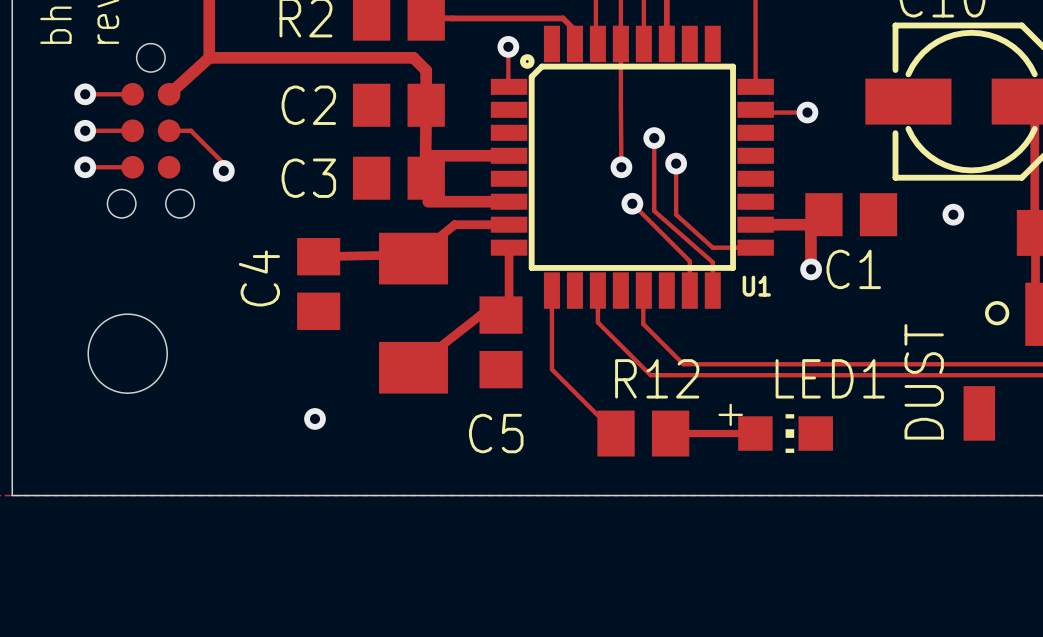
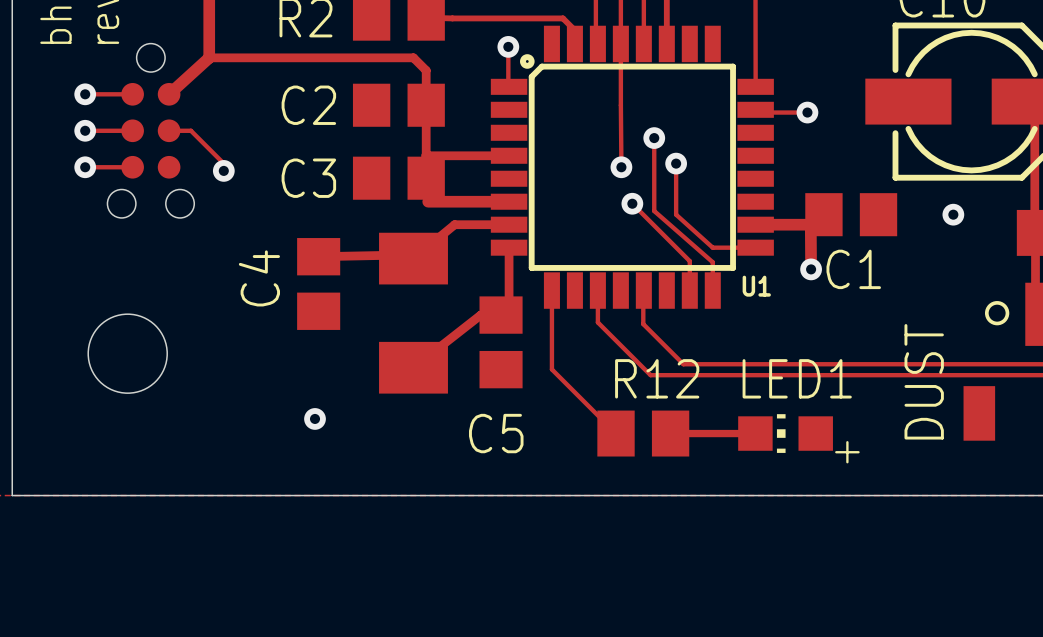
track width: thick (209, 57) (413, 57) (426, 70) (425, 155) (509, 155) -> thin (209, 57) (413, 57) (426, 70) (425, 155) (509, 155)
LED1 footprint: [738, 414, 833, 453] -> [738, 414, 833, 453]

